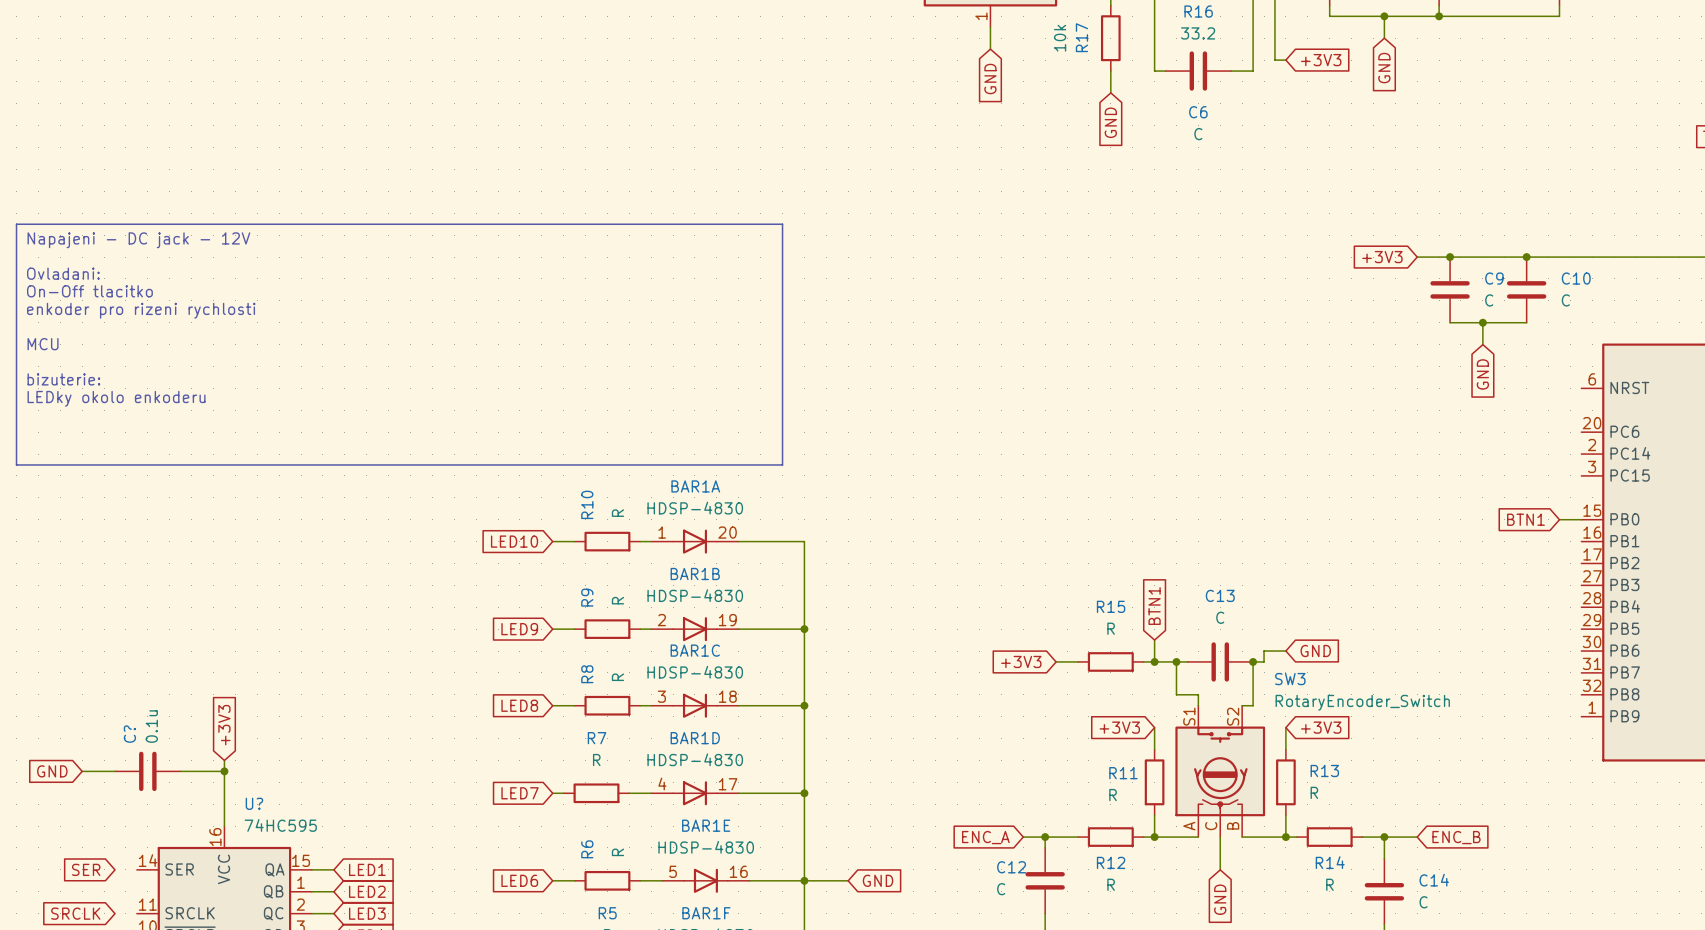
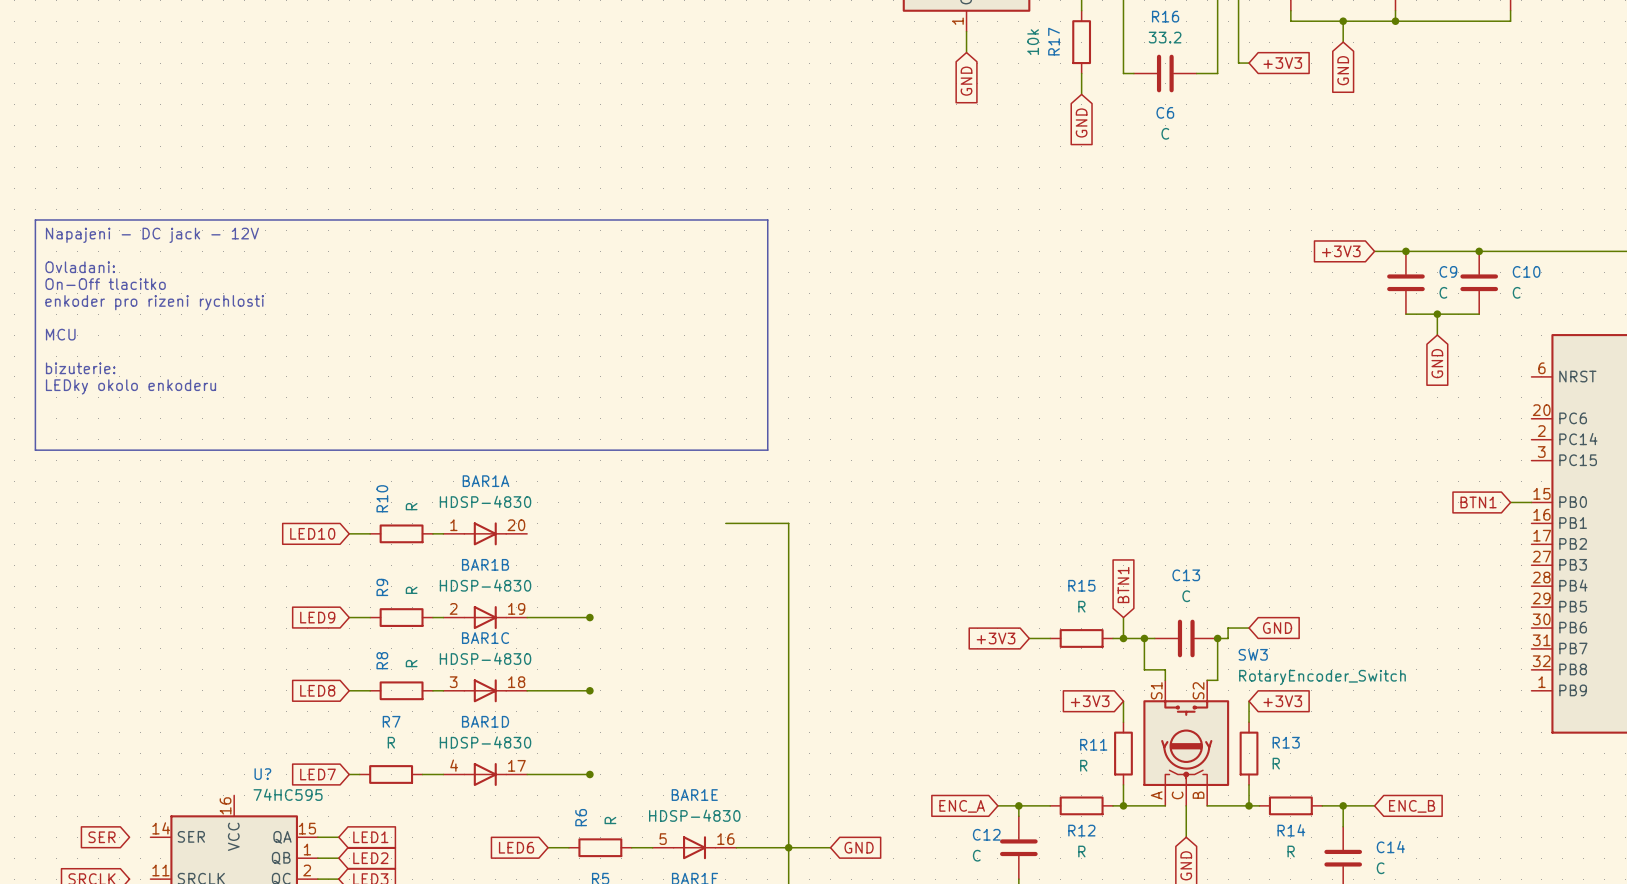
global label position: LED10 (514, 541) -> LED10 (312, 533)
wire: (552, 541) (574, 541) -> (349, 533) (370, 533)
R10 position: (607, 541) -> (401, 533)
wire: (640, 541) (651, 541) -> (432, 533) (443, 533)
BAR1A position: (694, 541) -> (485, 533)
global label position: LED9 (519, 629) -> LED9 (317, 617)
wire: (552, 629) (574, 629) -> (349, 617) (370, 617)
R9 position: (607, 629) -> (401, 617)
wire: (640, 629) (651, 629) -> (432, 617) (443, 617)
BAR1B position: (694, 629) -> (485, 617)
wire: (738, 629) (804, 629) -> (527, 617) (589, 617)
junction: (804, 629) -> none
junction: none -> (589, 617)
global label: LED8 (519, 705) -> none
wire: (552, 705) (574, 705) -> (349, 690) (370, 690)
R8 position: (607, 705) -> (401, 690)
wire: (640, 705) (651, 705) -> (432, 690) (443, 690)
BAR1C position: (694, 705) -> (485, 690)
wire: (738, 705) (804, 705) -> (527, 690) (589, 690)
junction: (804, 705) -> none
global label: none -> LED8 (317, 690)
junction: none -> (589, 690)
global label: +3V3 (224, 725) -> none
wire: (224, 760) (224, 826) -> none
global label: GND (52, 771) -> none
wire: (82, 771) (115, 771) -> none
C?: 0.1u (147, 771) -> none
wire: (180, 771) (224, 771) -> none
junction: (224, 771) -> none
global label: LED7 (520, 793) -> none
wire: (552, 793) (563, 793) -> (349, 774) (359, 774)
R7 position: (596, 793) -> (391, 774)
wire: (629, 793) (651, 793) -> (422, 774) (443, 774)
BAR1D position: (694, 793) -> (485, 774)
wire: (738, 793) (804, 793) -> (527, 774) (589, 774)
junction: (804, 793) -> none
global label: none -> LED7 (317, 774)
junction: none -> (589, 774)

